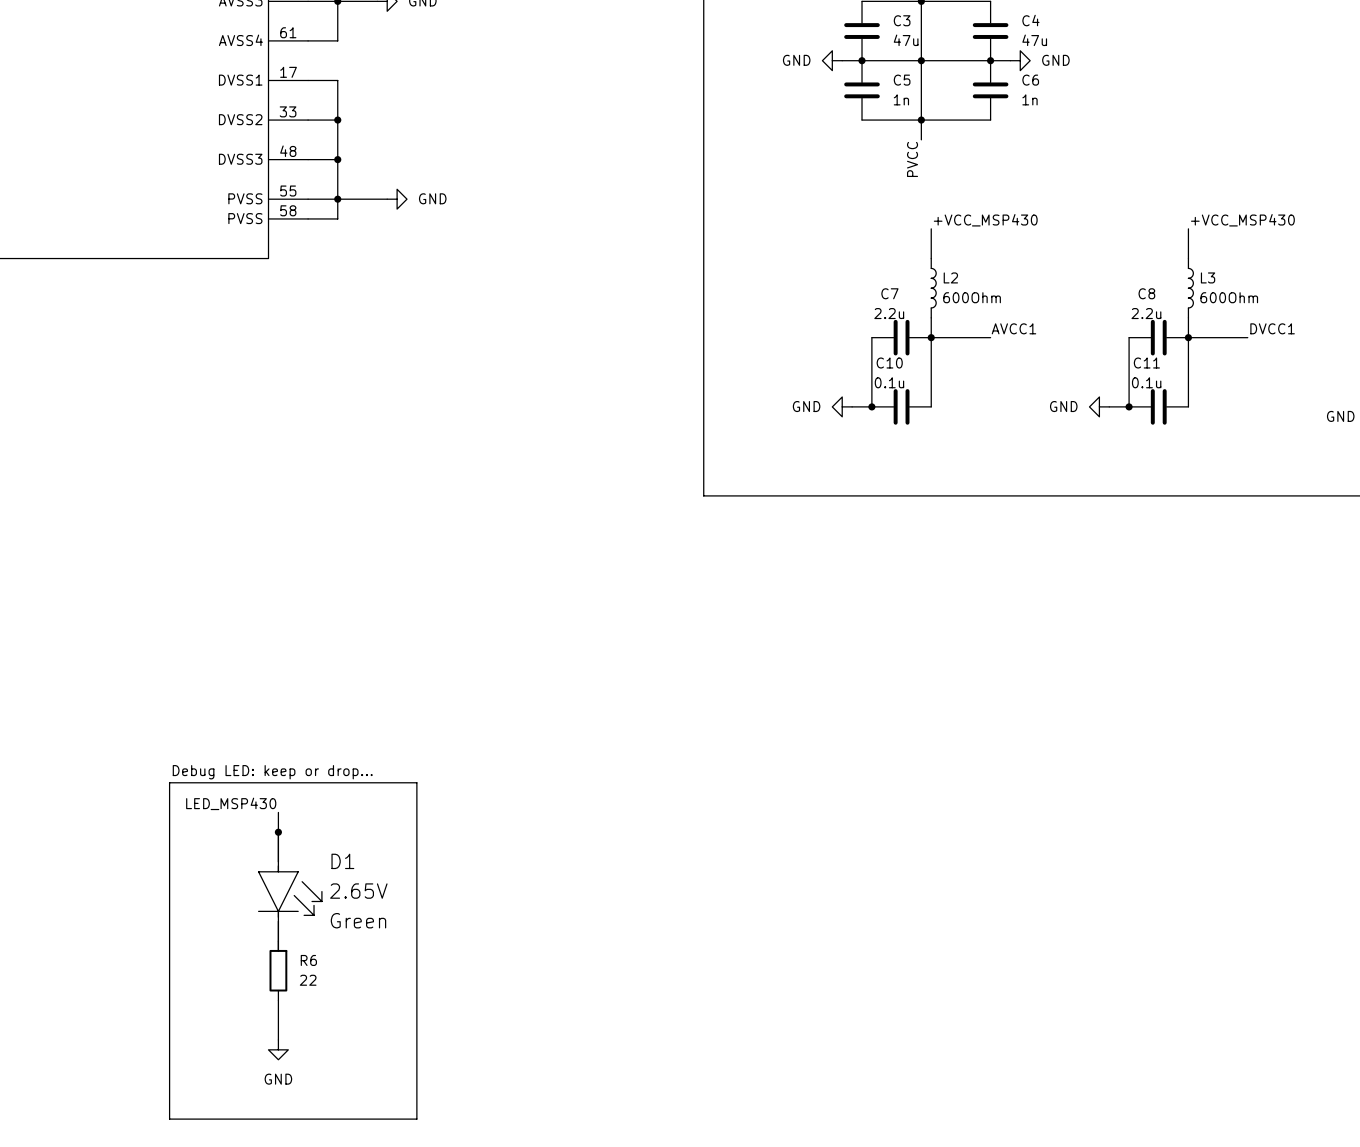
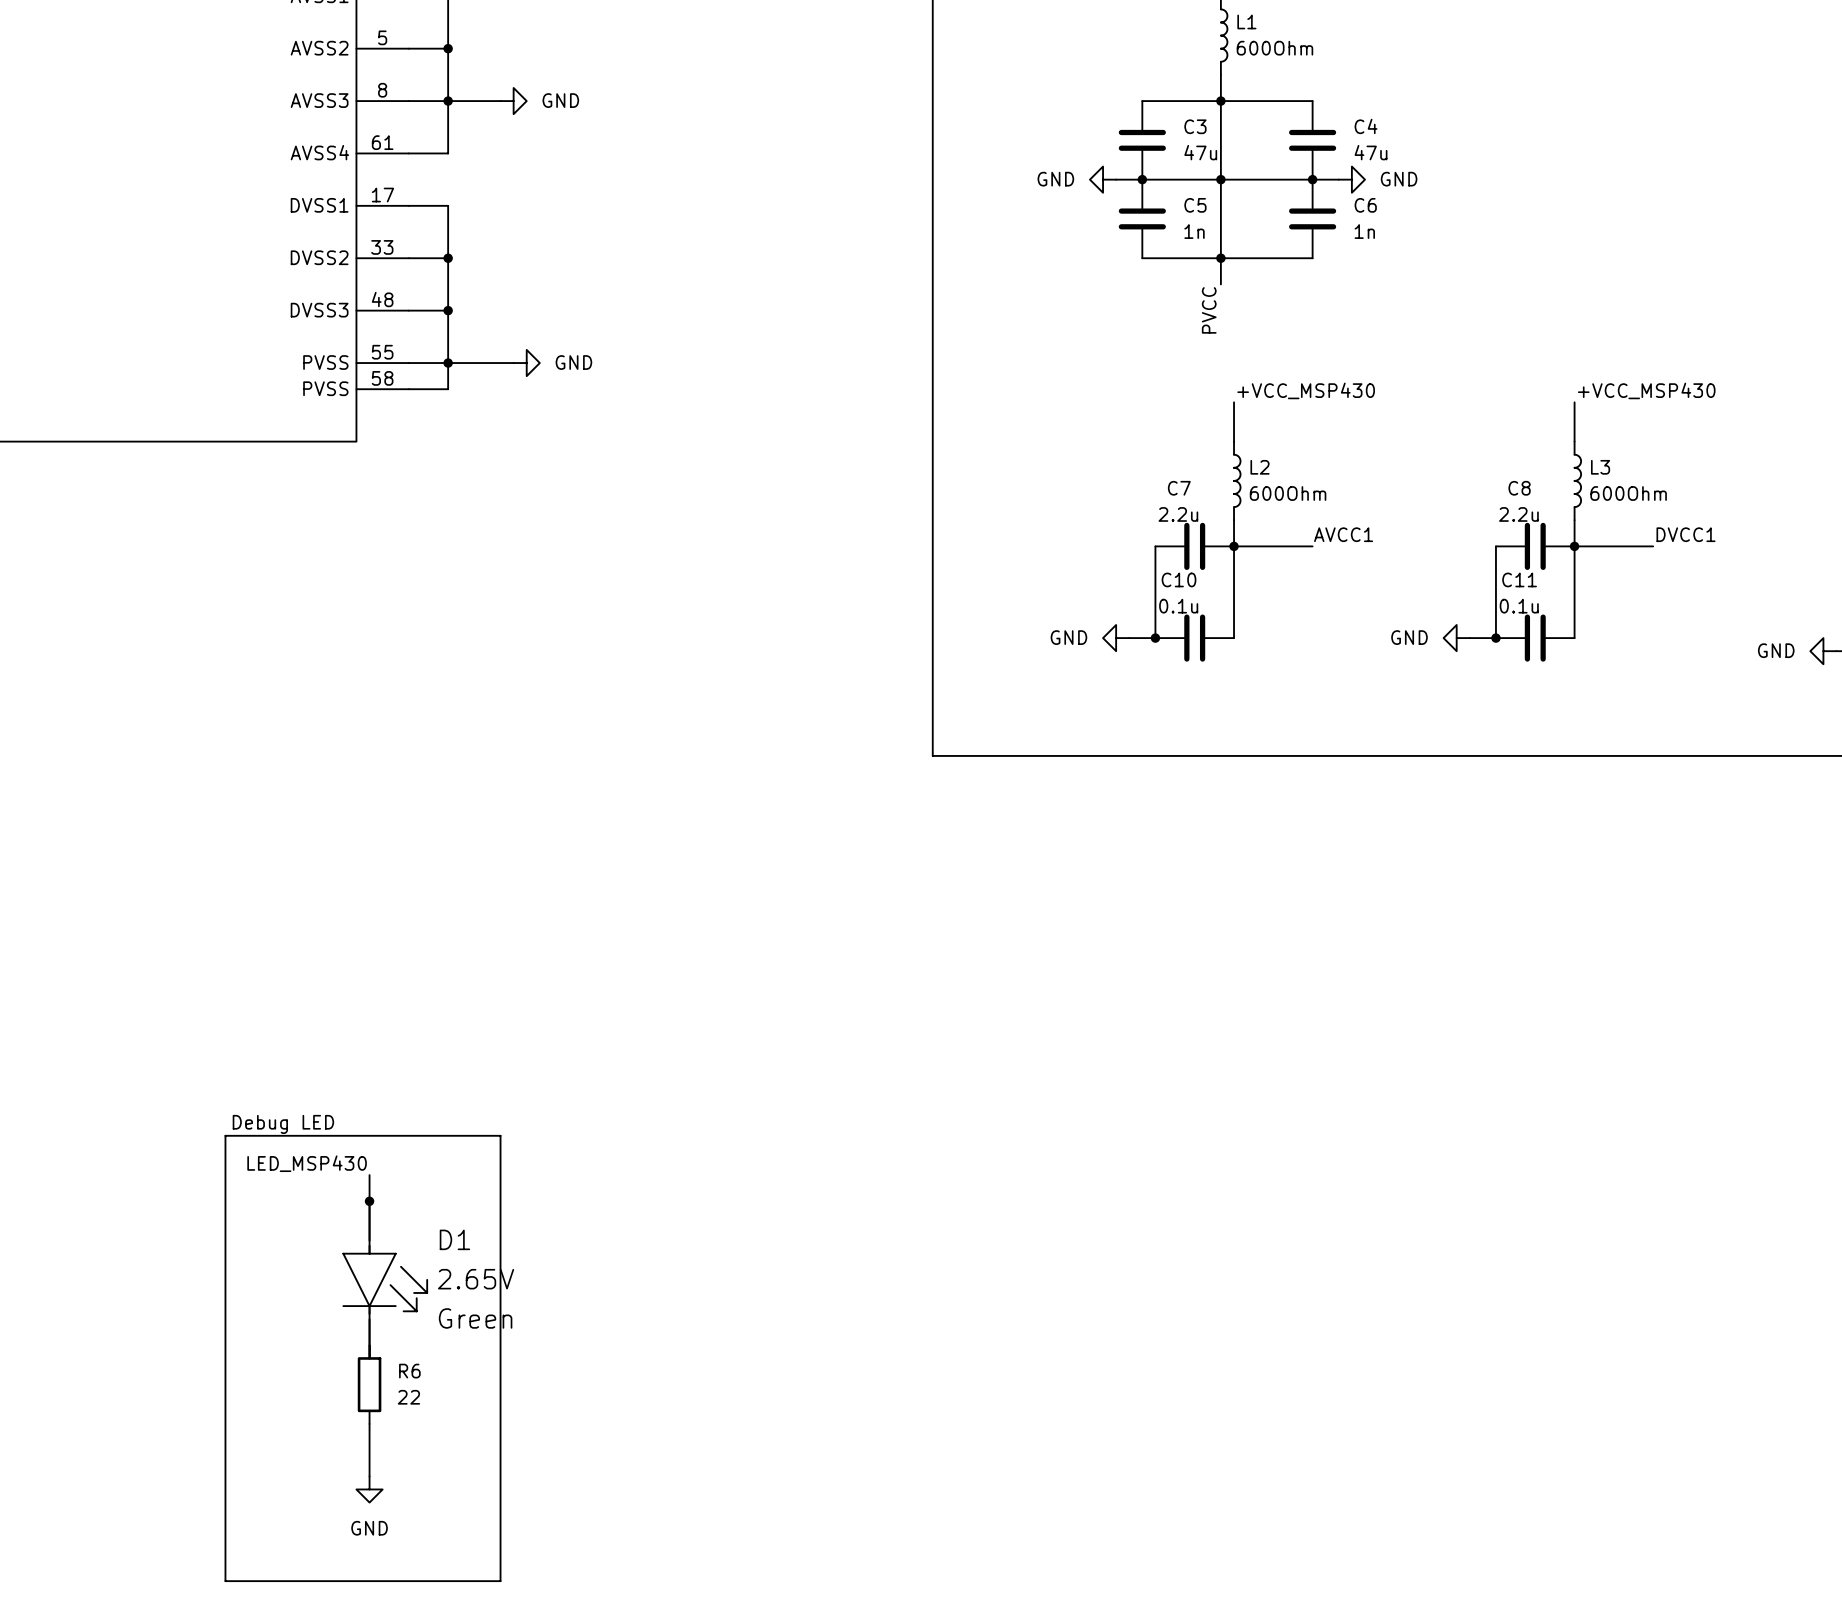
text: Debug LED: keep or drop... (272, 772) -> none
text: none -> Debug LED (283, 1124)
line: (377, 782) (416, 782) (416, 1119) (377, 1119) -> (500, 1135) (500, 1581)

